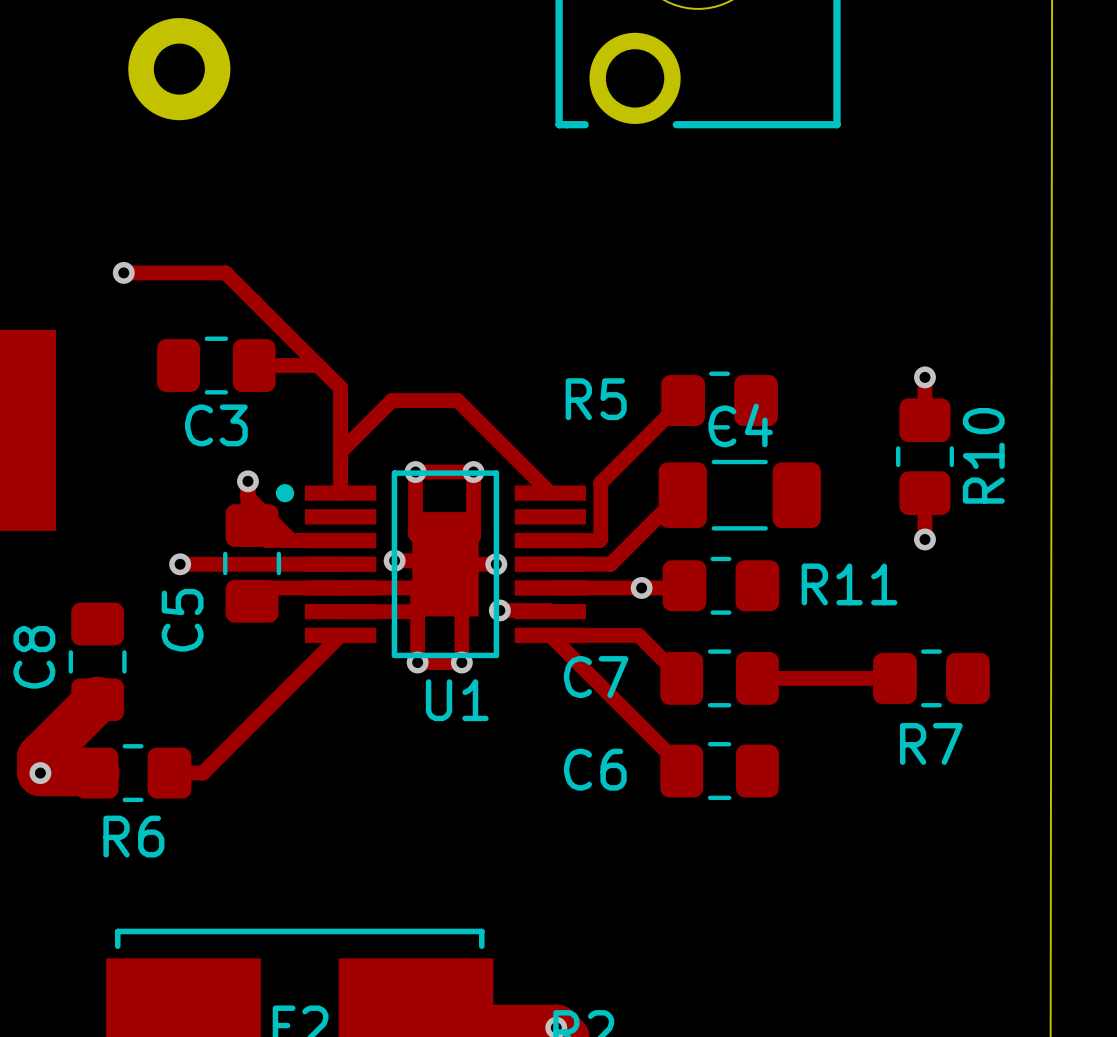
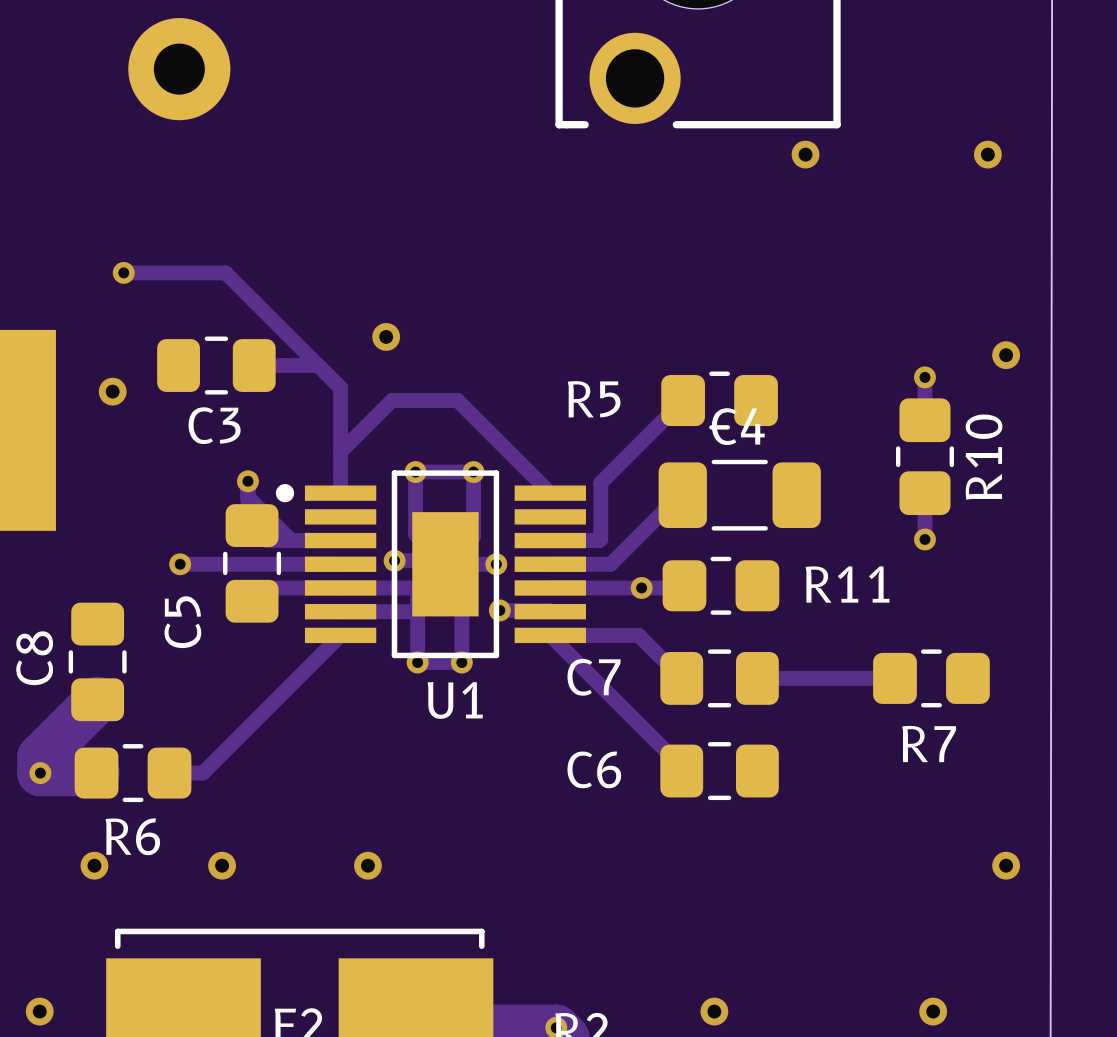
via: none -> (805, 154)
via: none -> (987, 154)
via: none -> (386, 336)
via: none -> (1006, 355)
via: none -> (112, 391)
via: none -> (94, 865)
via: none -> (222, 865)
via: none -> (367, 865)
via: none -> (1006, 865)
via: none -> (39, 1011)
via: none -> (714, 1011)
via: none -> (933, 1011)

